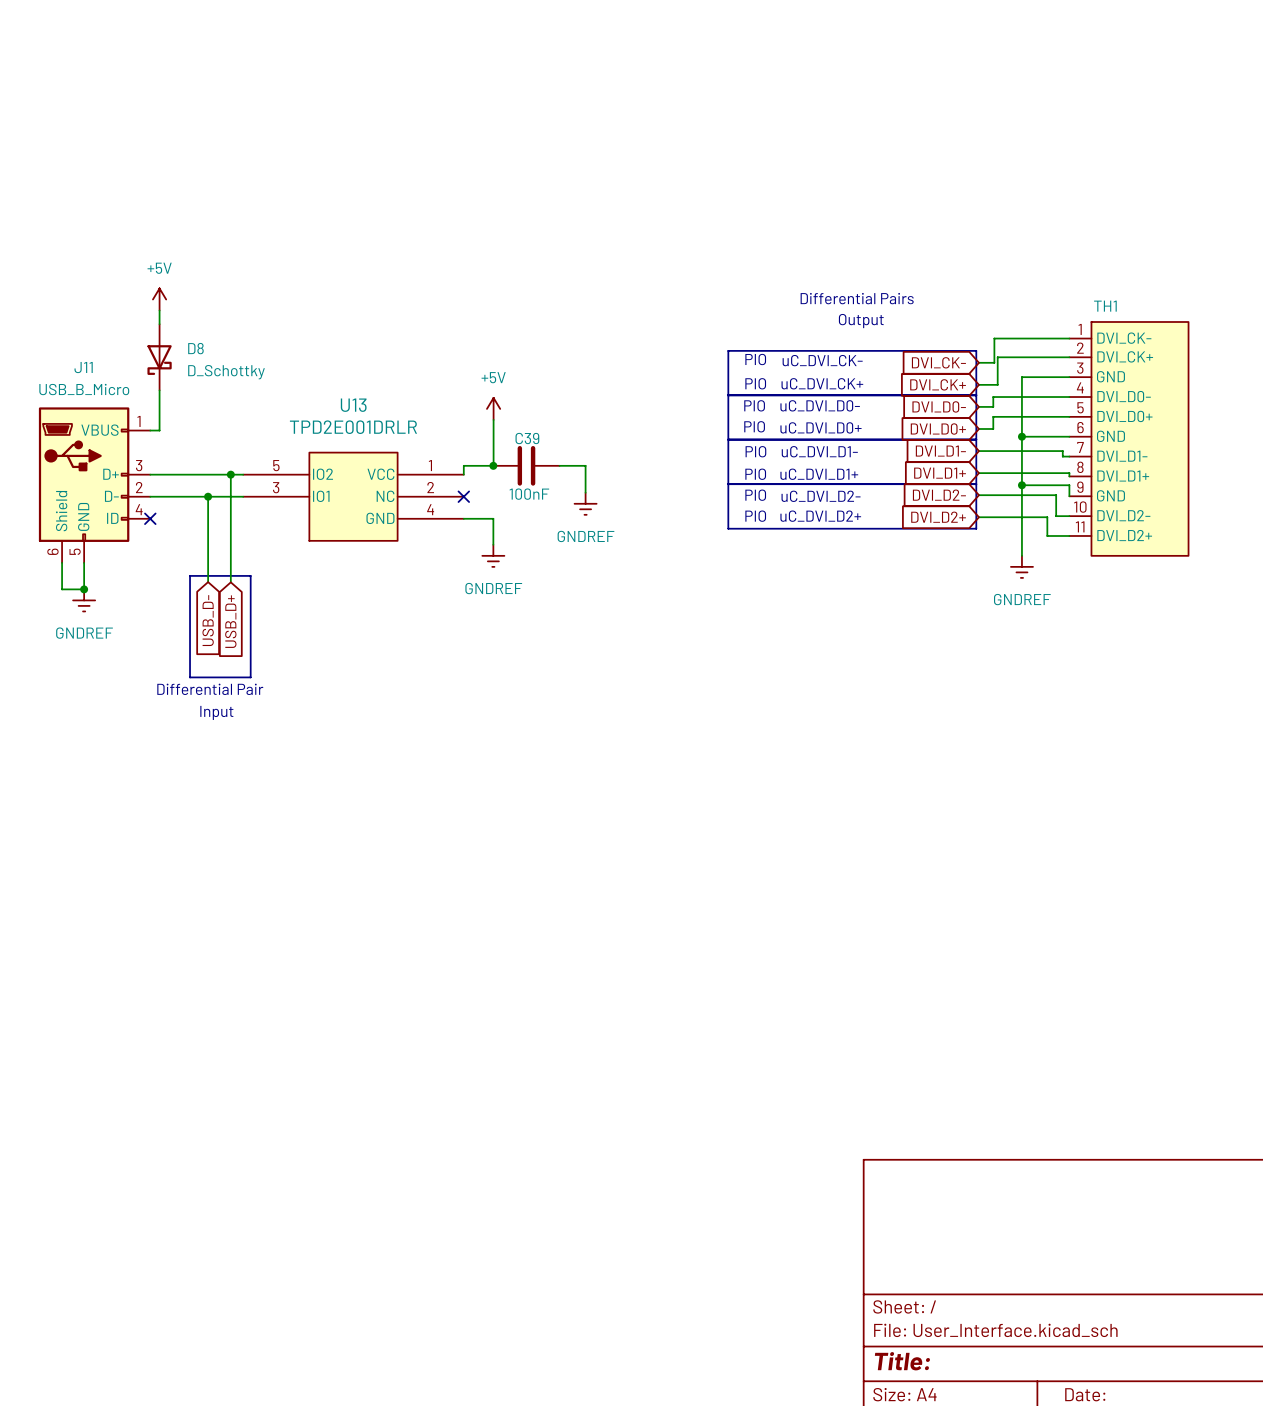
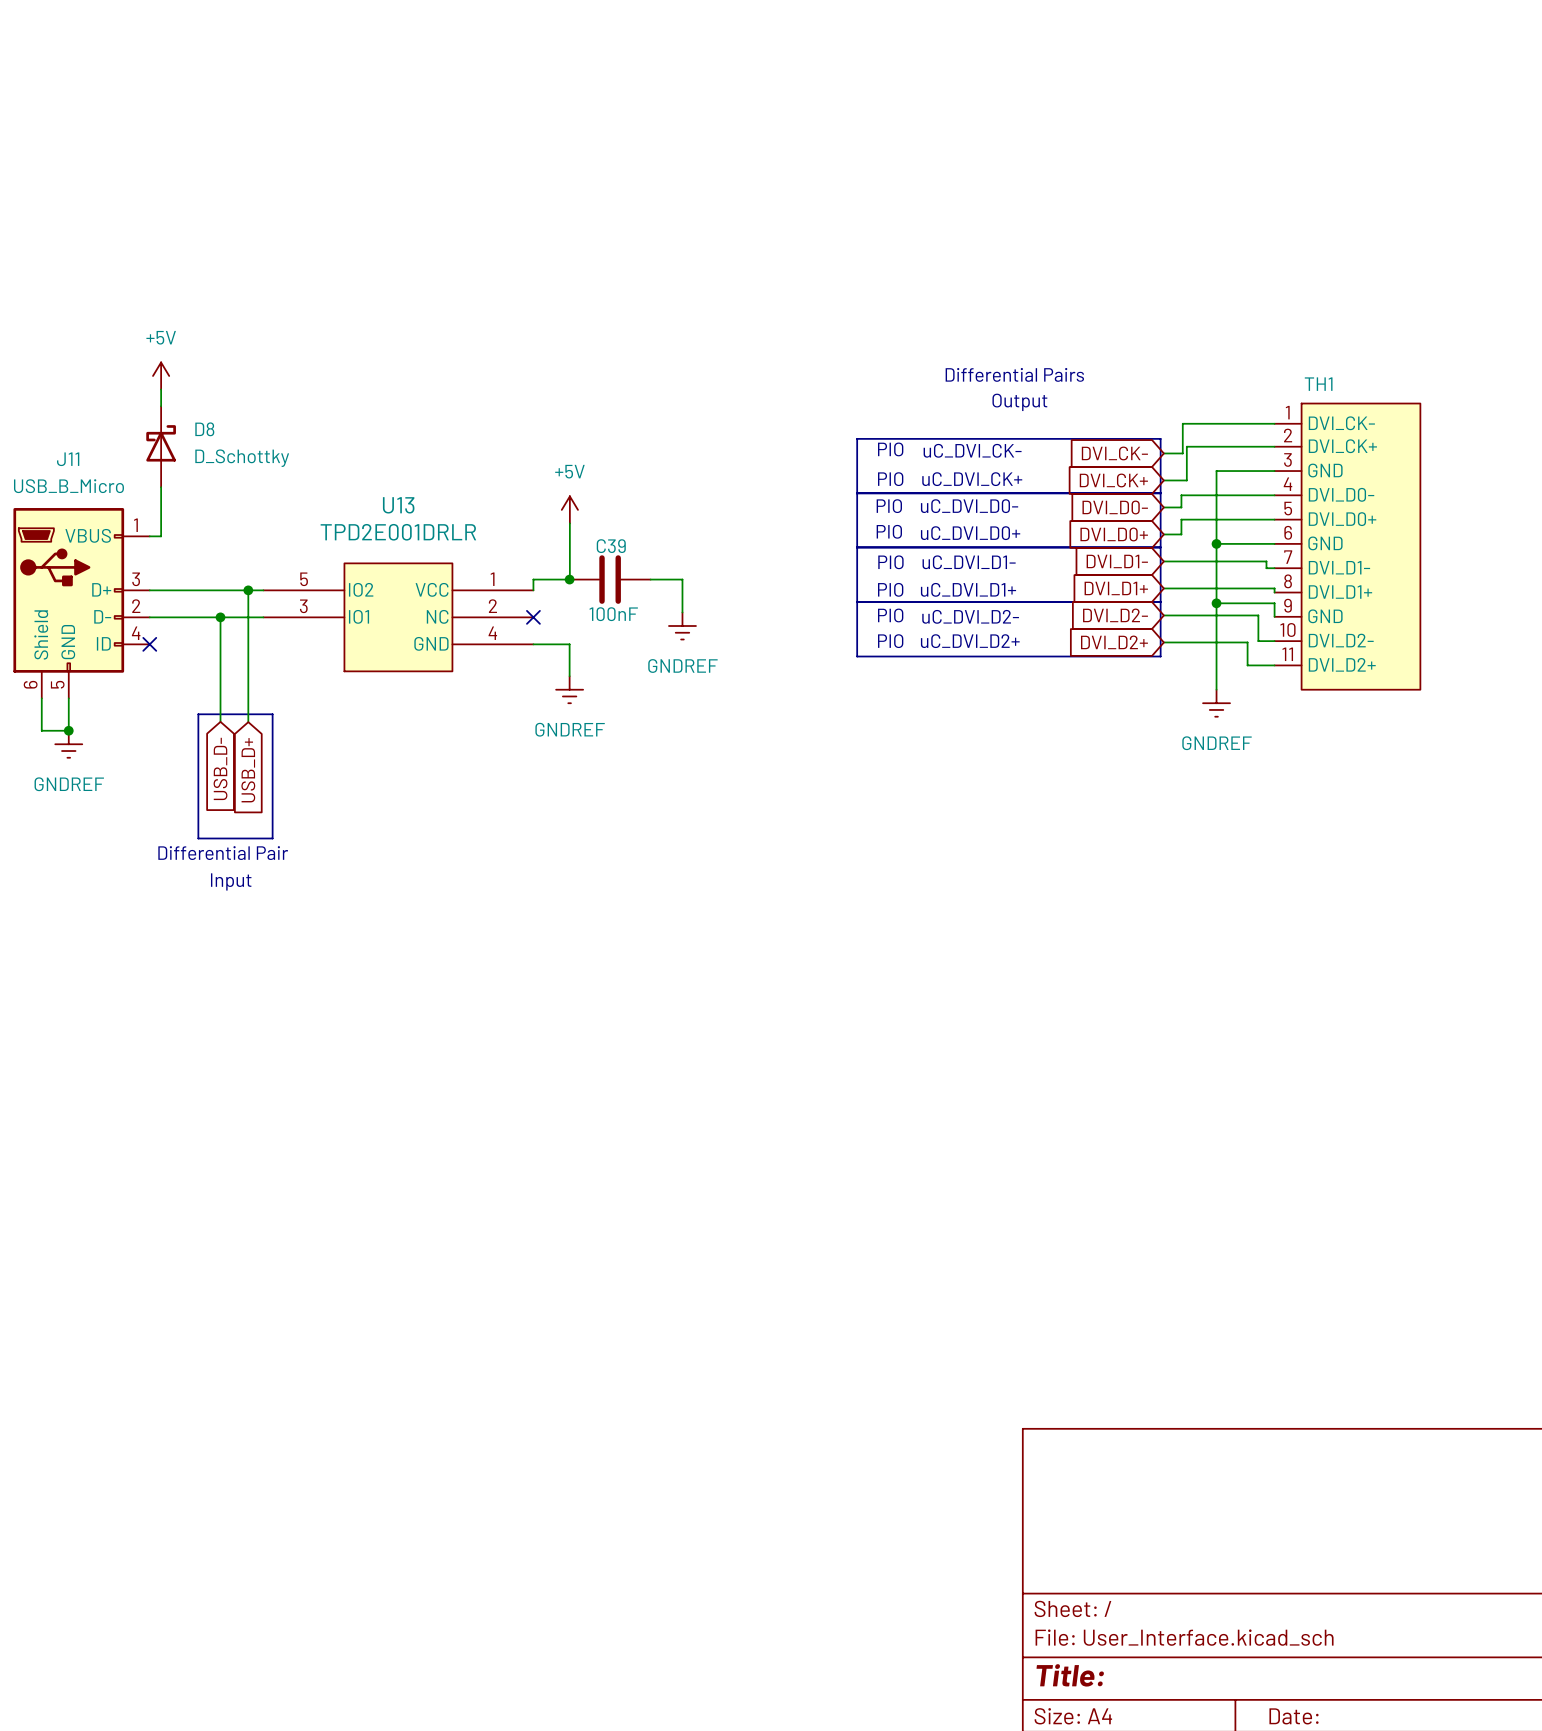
D8 rotation: 0° (159, 360) -> 180° (161, 443)

